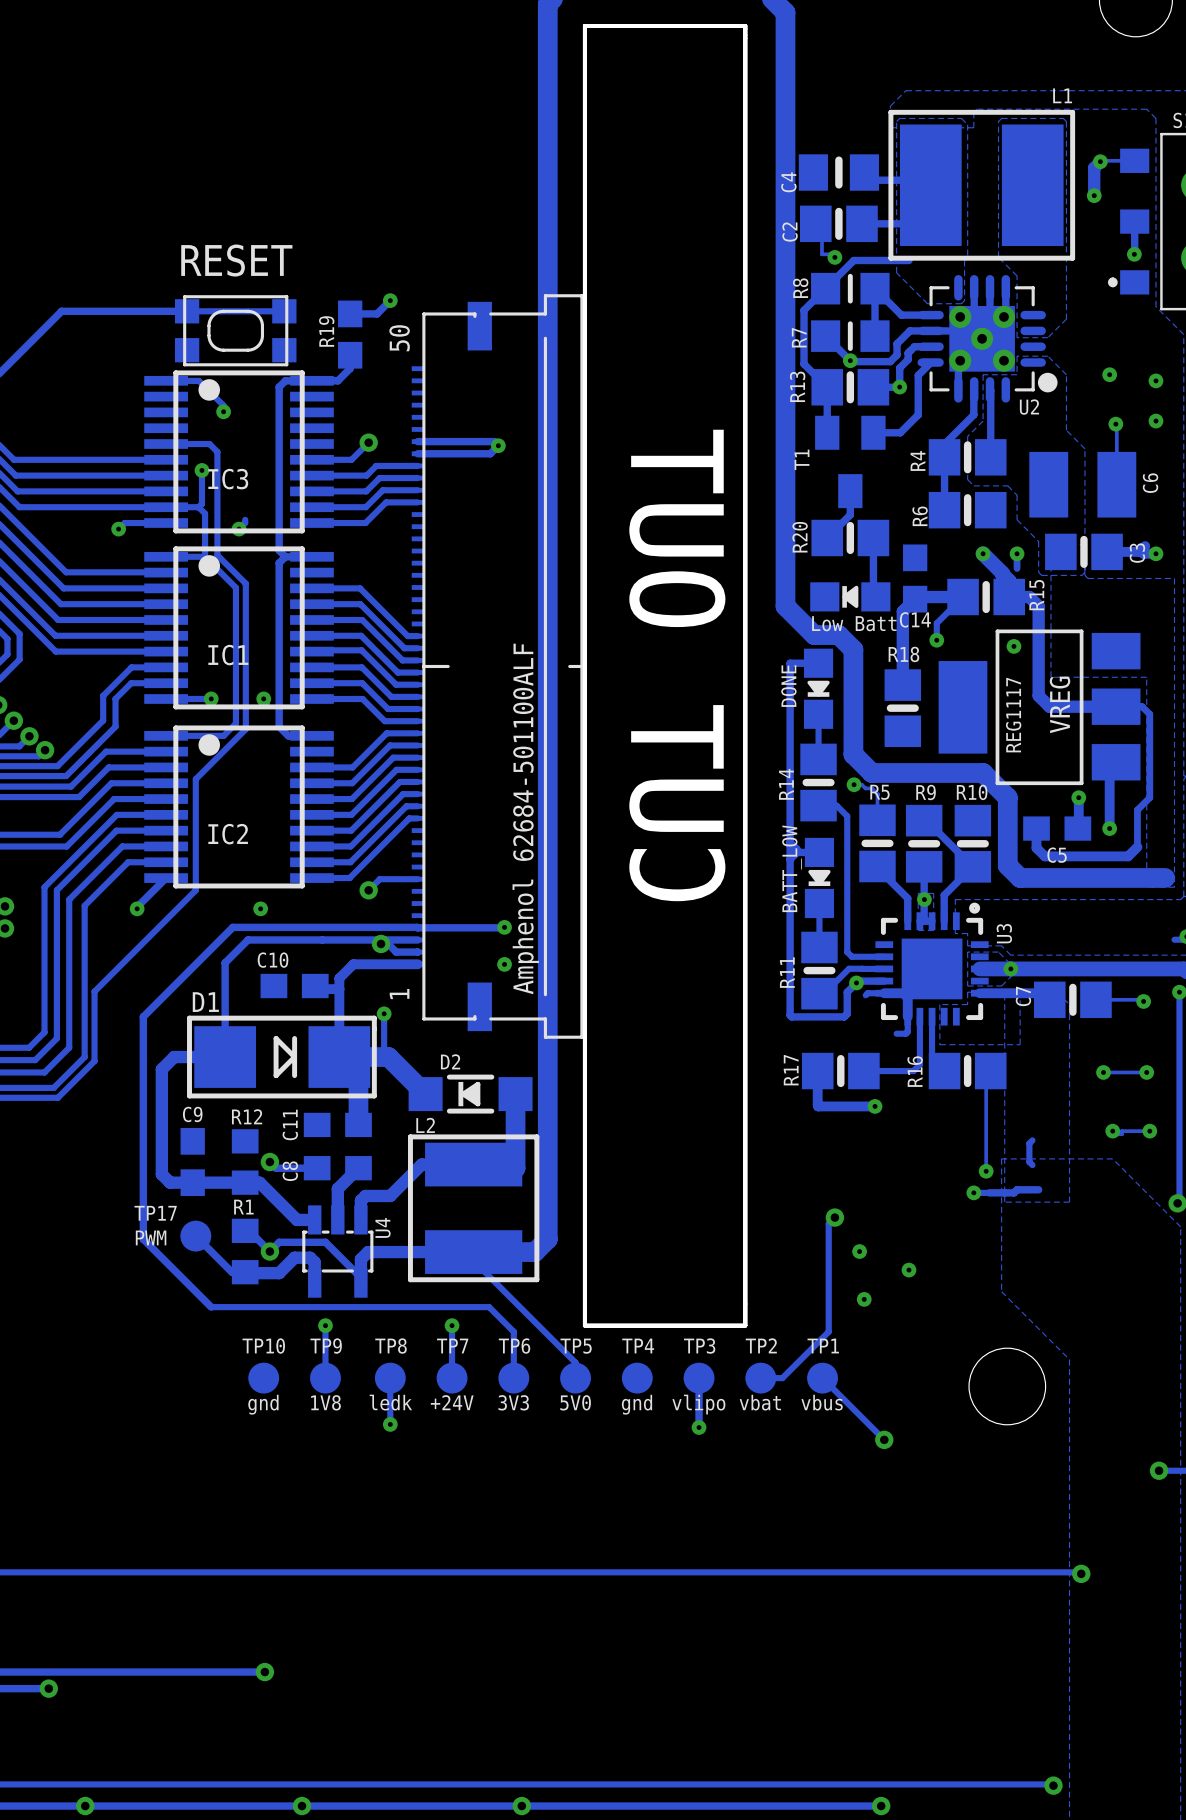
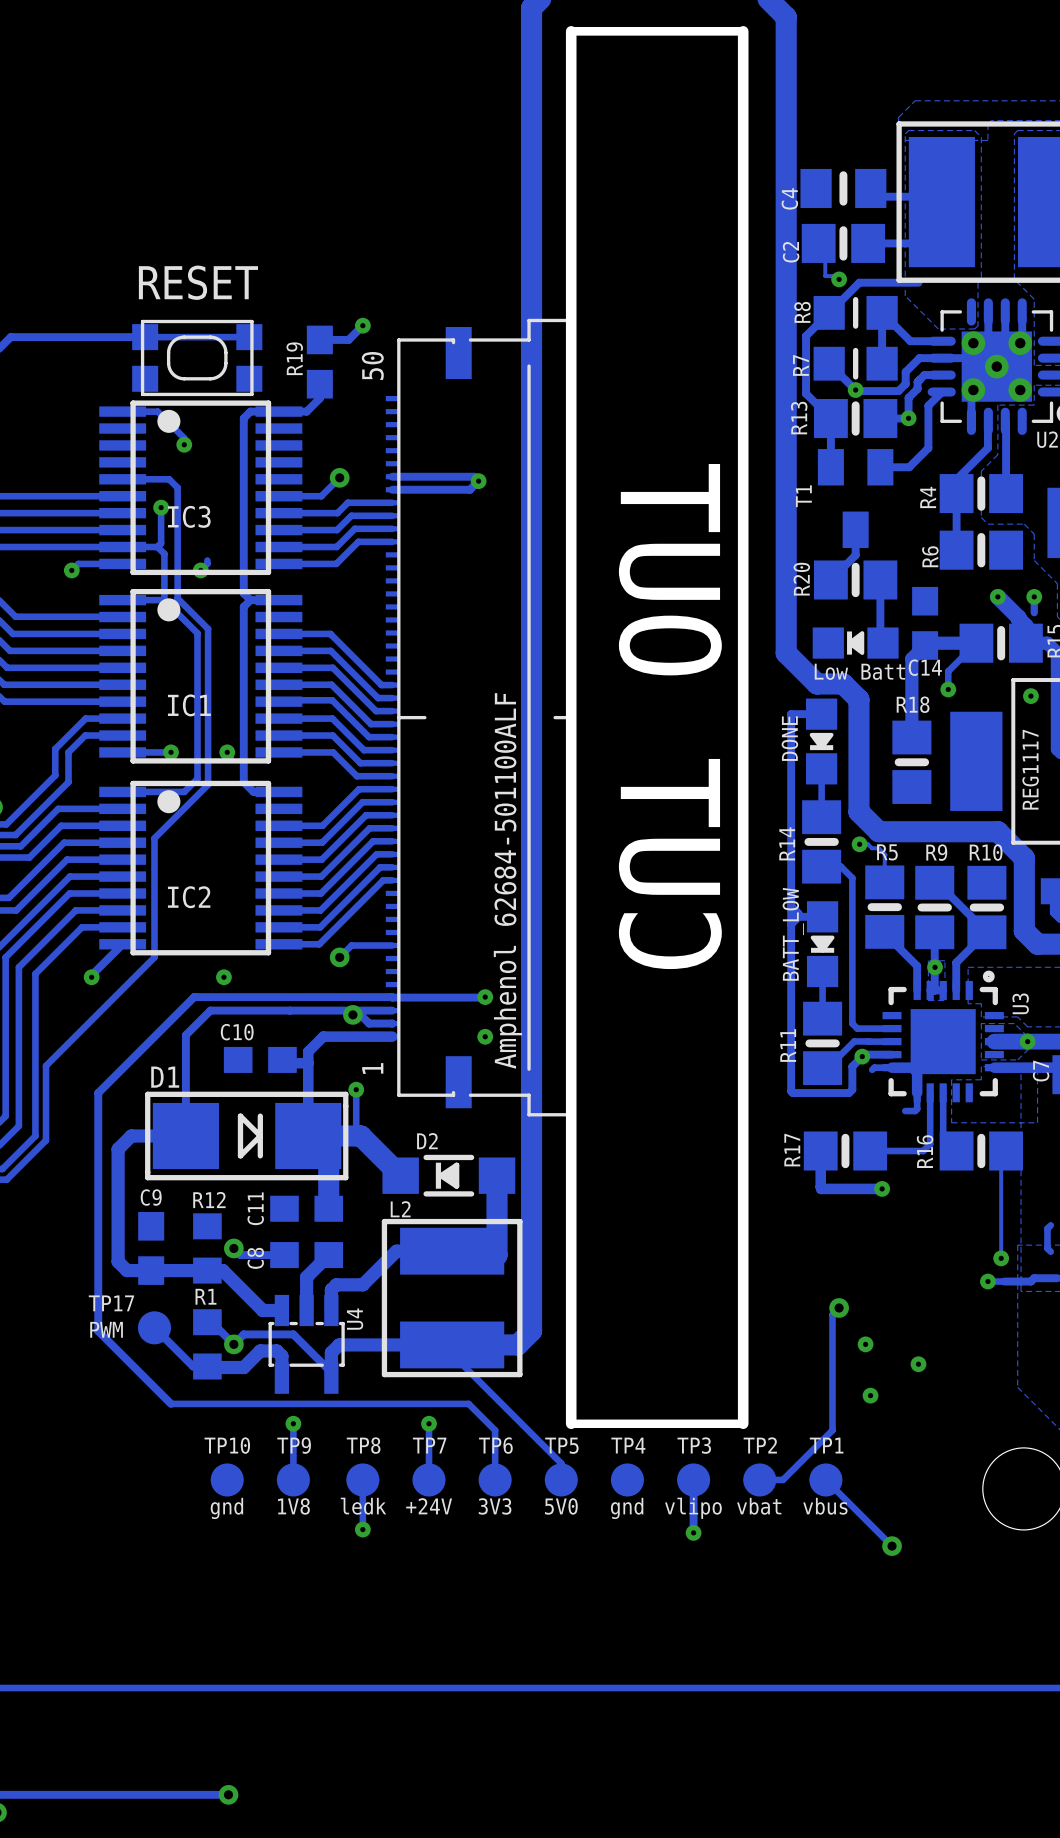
board edge width: thin (745, 25) (745, 1325) (584, 1325) (584, 25) (745, 25) -> thick (743, 31) (743, 1423) (571, 1423) (571, 31) (743, 31)

